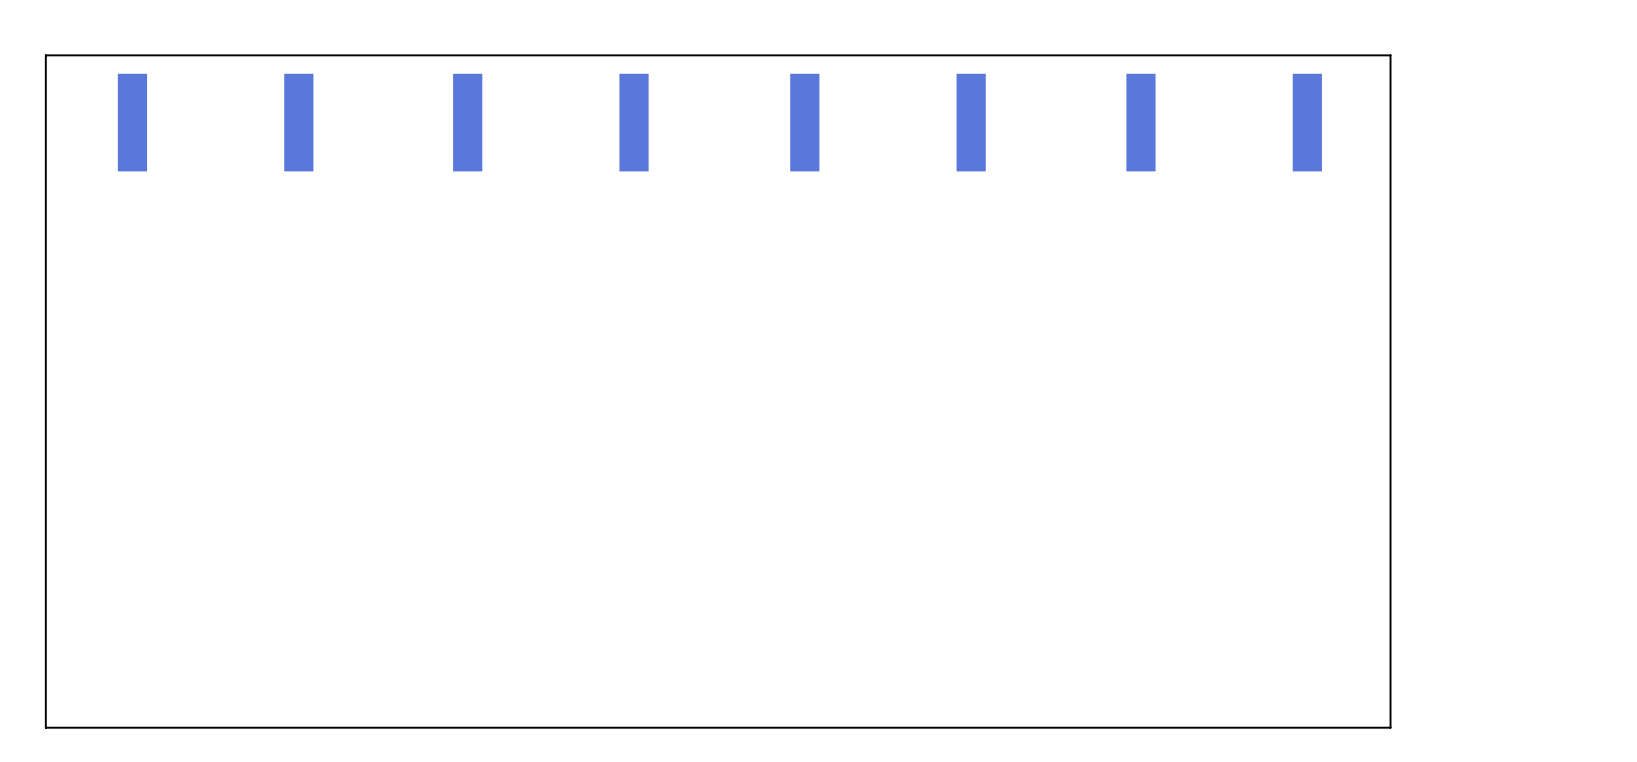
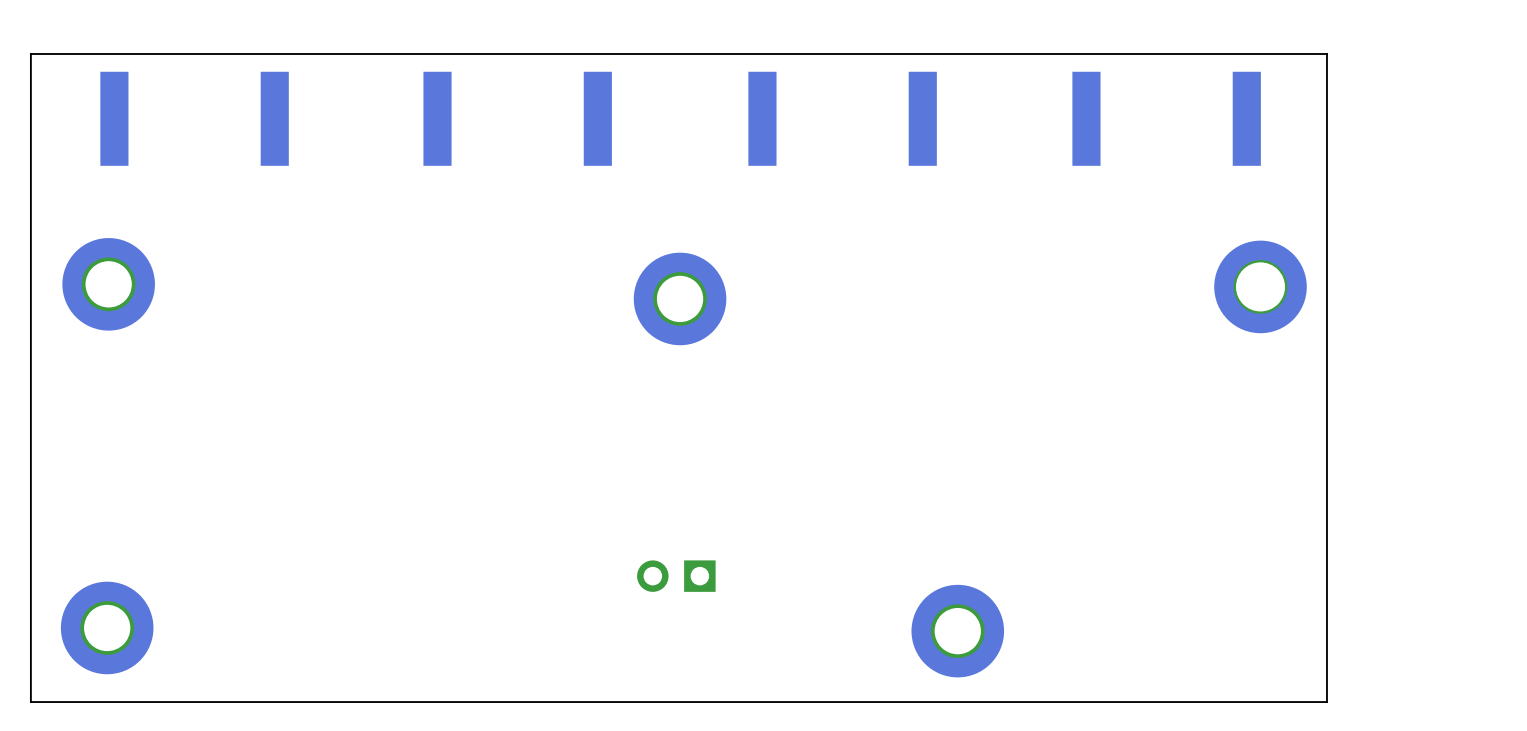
part: none -> (108, 284)
part: none -> (1260, 286)
part: none -> (680, 298)
part: none -> (676, 576)
part: none -> (107, 627)
part: none -> (957, 631)

